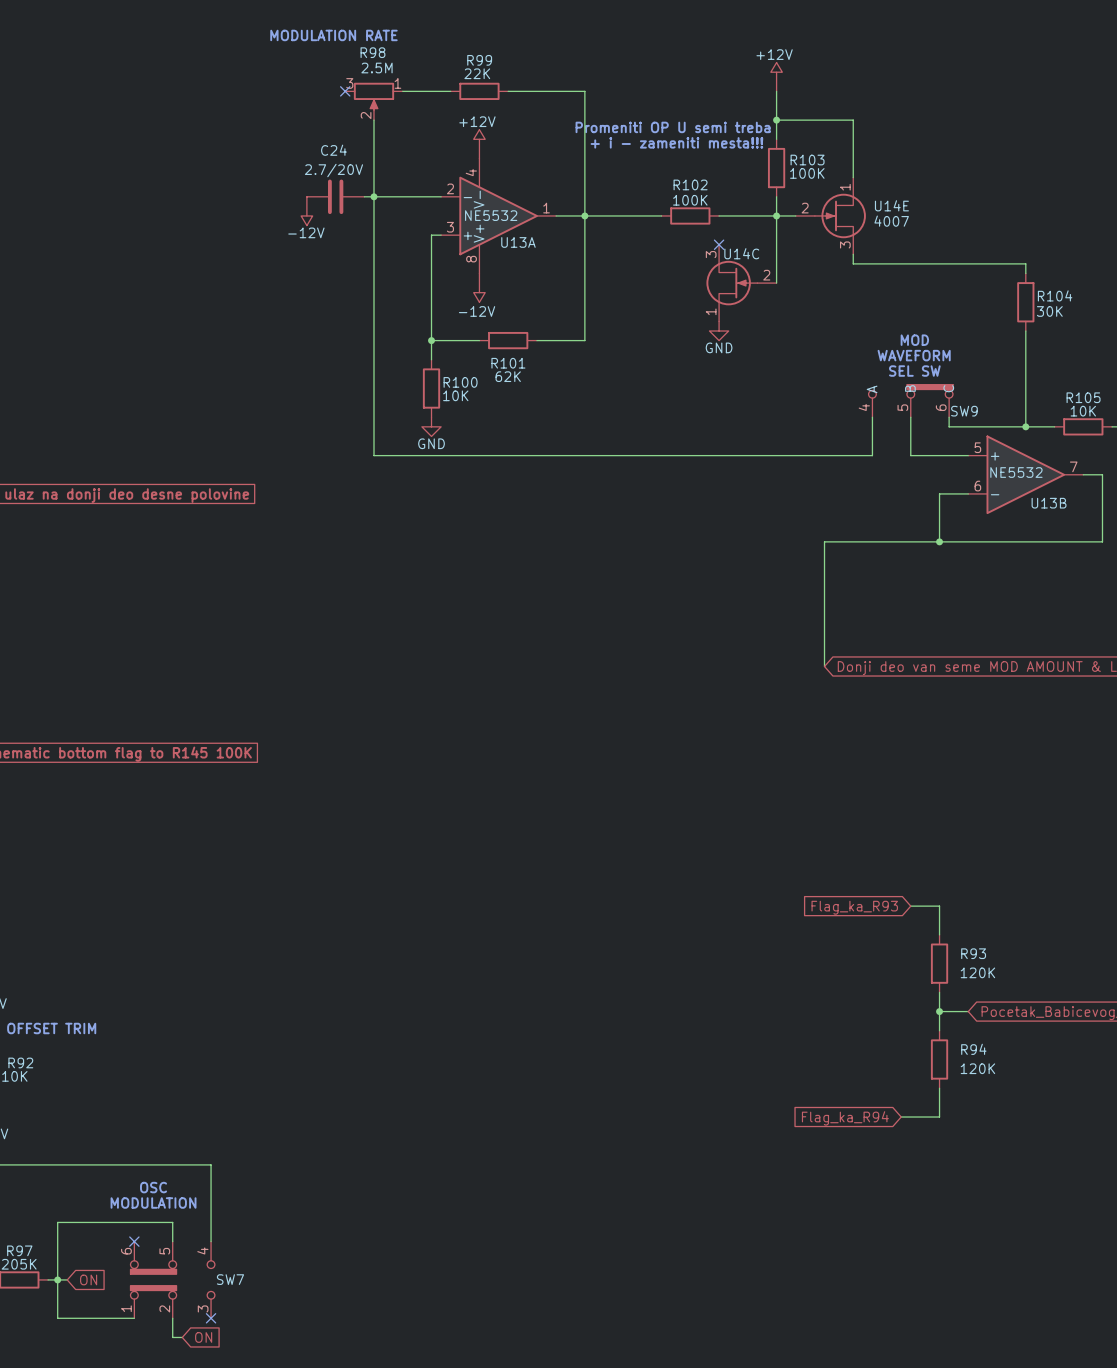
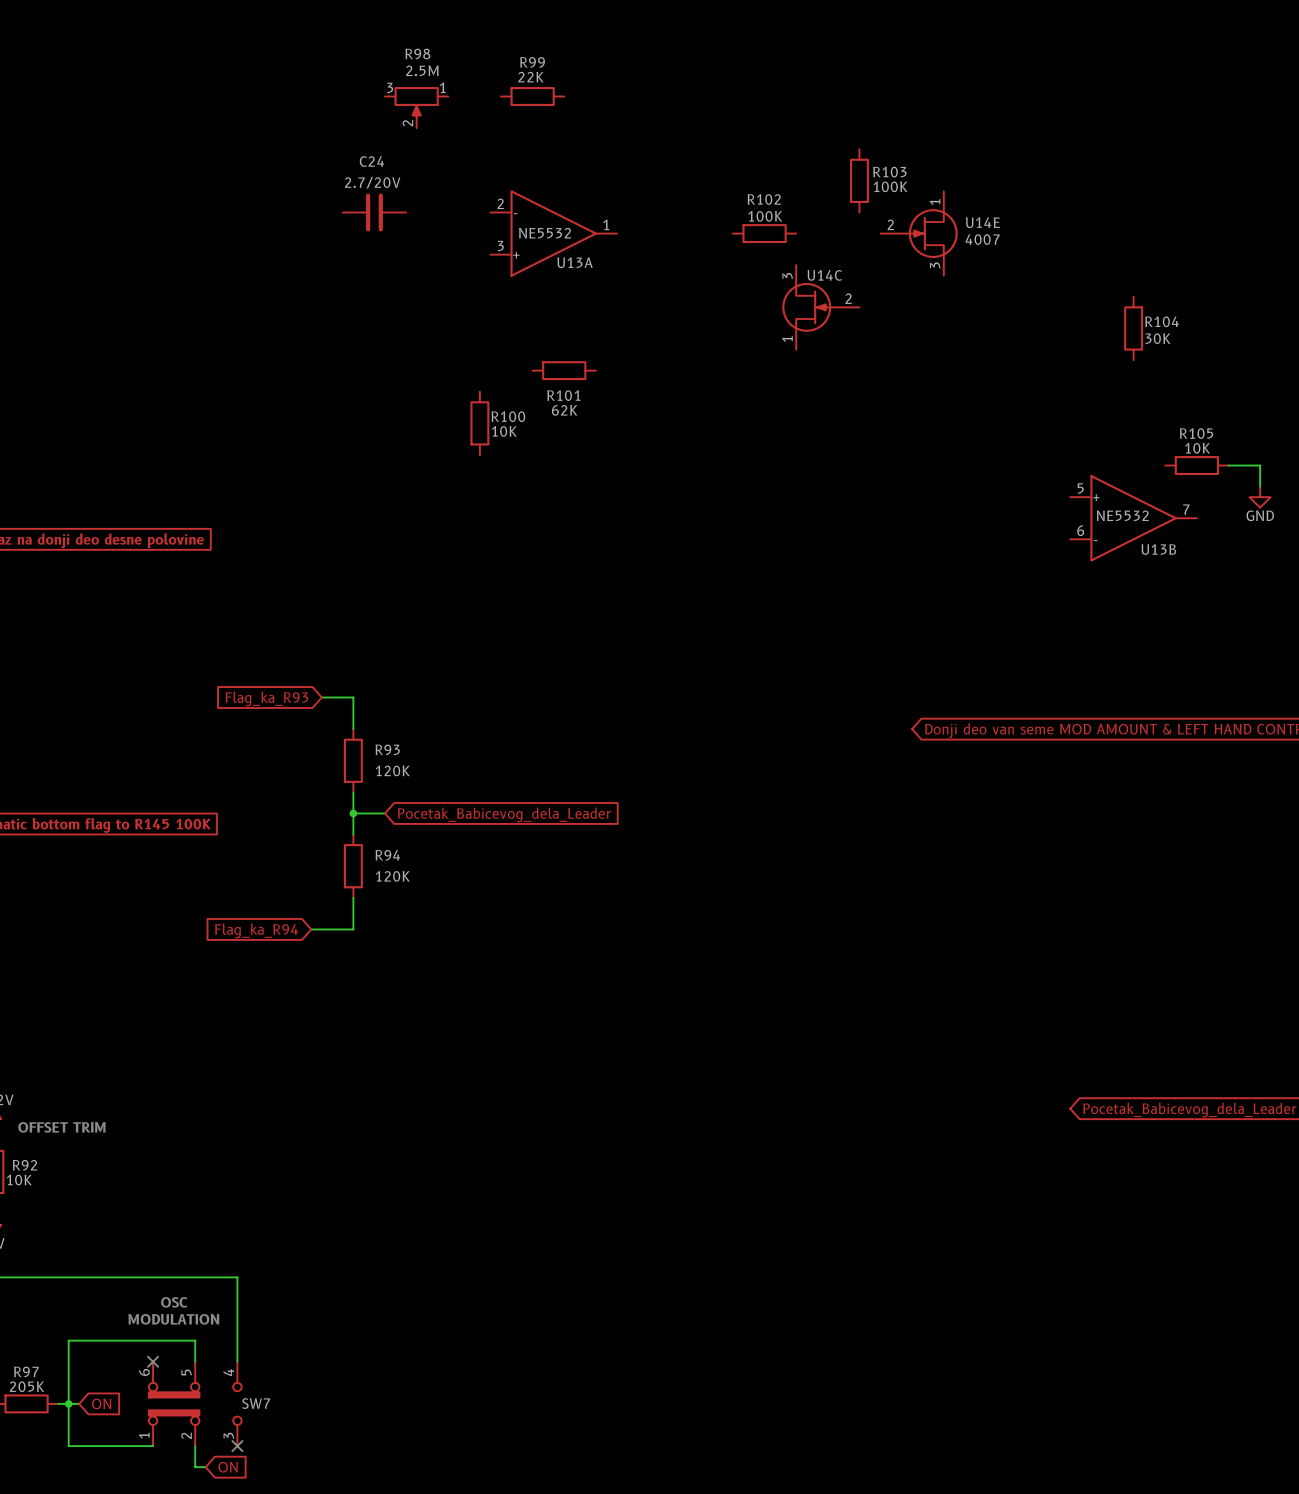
text: MODULATION RATE (333, 35) -> none
part: +12V (776, 76) -> none
no-connect mark: (345, 91) -> none
wire: (402, 91) (450, 91) -> none
wire: (508, 91) (584, 91) (584, 340) (536, 340) -> none
wire: (776, 91) (776, 139) -> none
wire: (373, 120) (373, 455) (872, 455) (872, 417) -> none
wire: (776, 120) (853, 120) (853, 177) -> none
junction: (776, 120) -> none
text: Promeniti OP U semi treba (673, 127) -> none
text: + i - zameniti mesta!!! (676, 142) -> none
part: +12V (479, 144) -> none
wire: (364, 196) (441, 196) -> none
junction: (373, 196) -> none
wire: (776, 196) (776, 283) -> none
part: -12V (306, 211) -> none
part: (479, 215) -> none
wire: (556, 215) (661, 215) -> none
junction: (584, 215) -> none
wire: (719, 215) (795, 215) -> none
junction: (776, 215) -> none
wire: (441, 235) (431, 235) (431, 359) -> none
no-connect mark: (719, 244) -> none
wire: (853, 254) (853, 263) (1025, 263) (1025, 273) -> none
part: -12V (479, 287) -> none
power symbol: GND (719, 331) -> none
wire: (1025, 331) (1025, 426) -> none
wire: (431, 340) (479, 340) -> none
junction: (431, 340) -> none
text: MOD (914, 340) -> none
text: WAVEFORM (914, 355) -> none
text: SEL SW (914, 371) -> none
SW9: (910, 400) -> none
wire: (910, 417) (910, 455) (968, 455) -> none
wire: (949, 417) (949, 426) (1054, 426) -> none
power symbol: GND (431, 426) -> none
junction: (1025, 426) -> none
wire: (1083, 474) (1102, 474) (1102, 541) (824, 541) (824, 666) -> none
wire: (968, 493) (939, 493) (939, 541) -> none
junction: (939, 541) -> none
wire: none -> (321, 697) (353, 697) (353, 729)
global label: none -> Flag_ka_R93 (266, 698)
wire: none -> (353, 792) (353, 834)
wire: none -> (353, 813) (385, 813)
junction: none -> (353, 813)
global label: none -> Pocetak_Babicevog_dela_Leader (504, 814)
wire: none -> (353, 897) (353, 929) (311, 929)
global label: none -> Flag_ka_R94 (256, 930)
wire: (910, 906) (939, 906) (939, 934) -> none
global label: Flag_ka_R93 (854, 907) -> none
R93 position: (939, 963) -> (353, 760)
wire: (939, 992) (939, 1030) -> none
wire: (939, 1011) (968, 1011) -> none
junction: (939, 1011) -> none
R94 position: (939, 1059) -> (353, 866)
wire: (939, 1088) (939, 1117) (901, 1117) -> none
global label: Flag_ka_R94 (845, 1118) -> none

